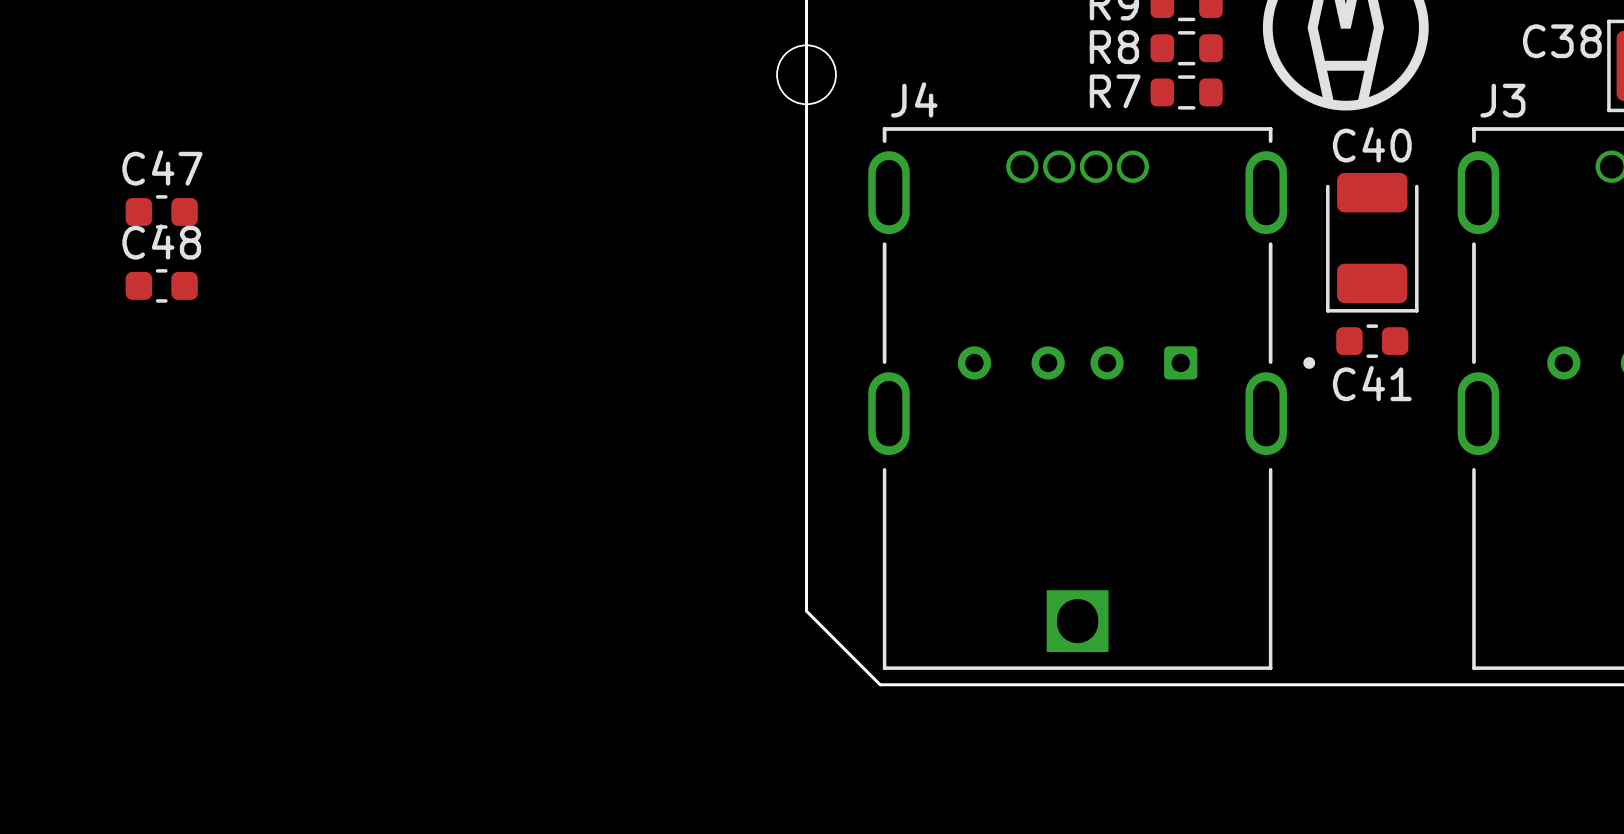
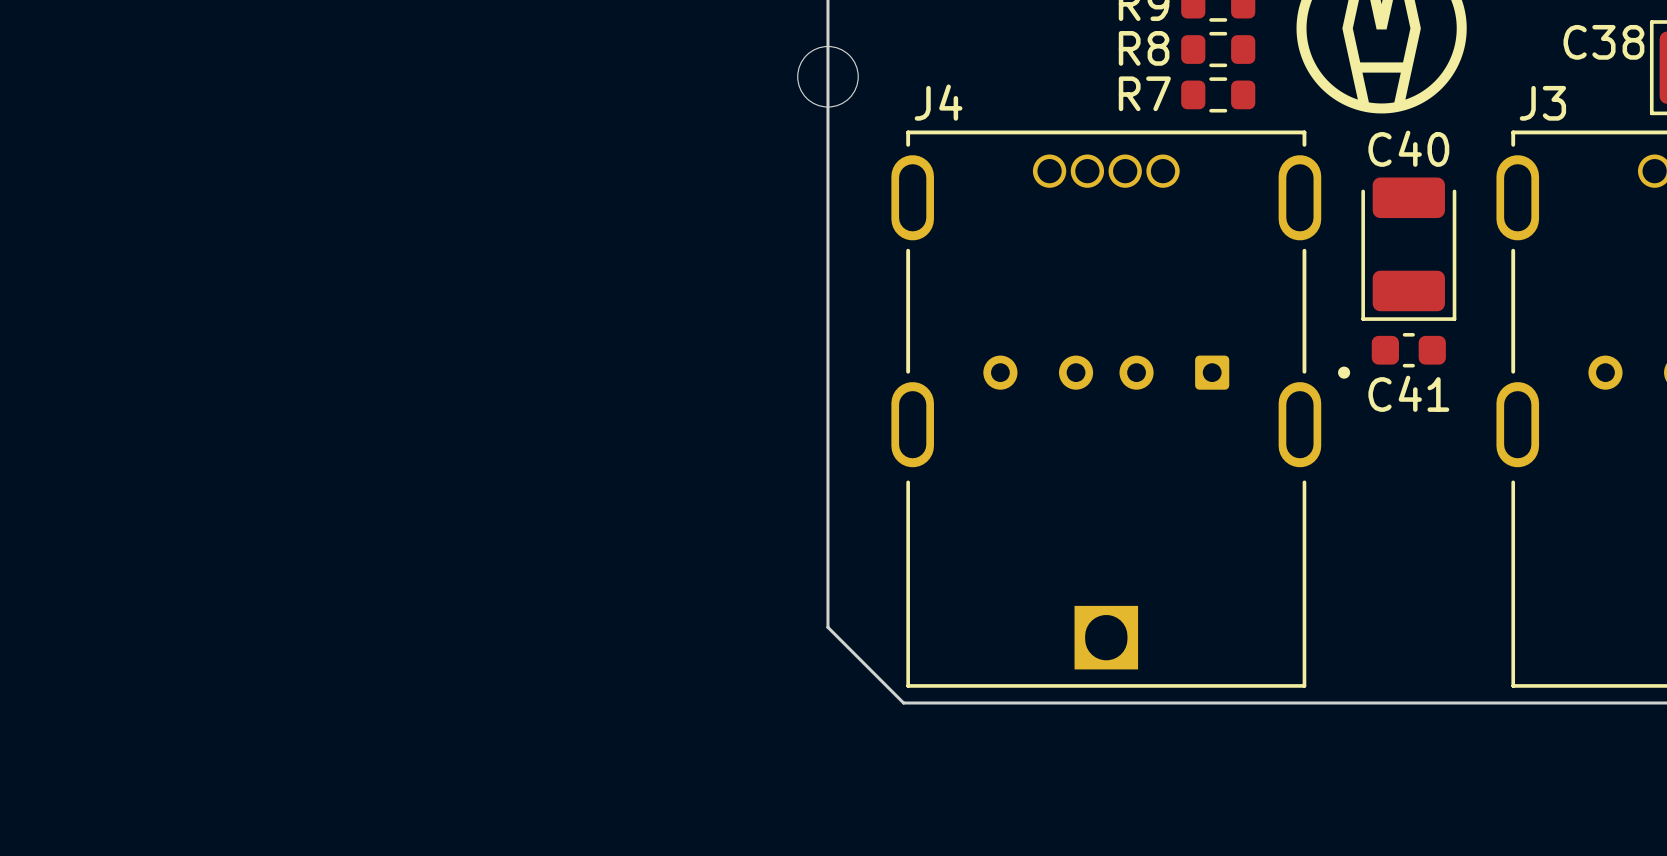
C47: (161, 211) -> none
C48: (161, 285) -> none

